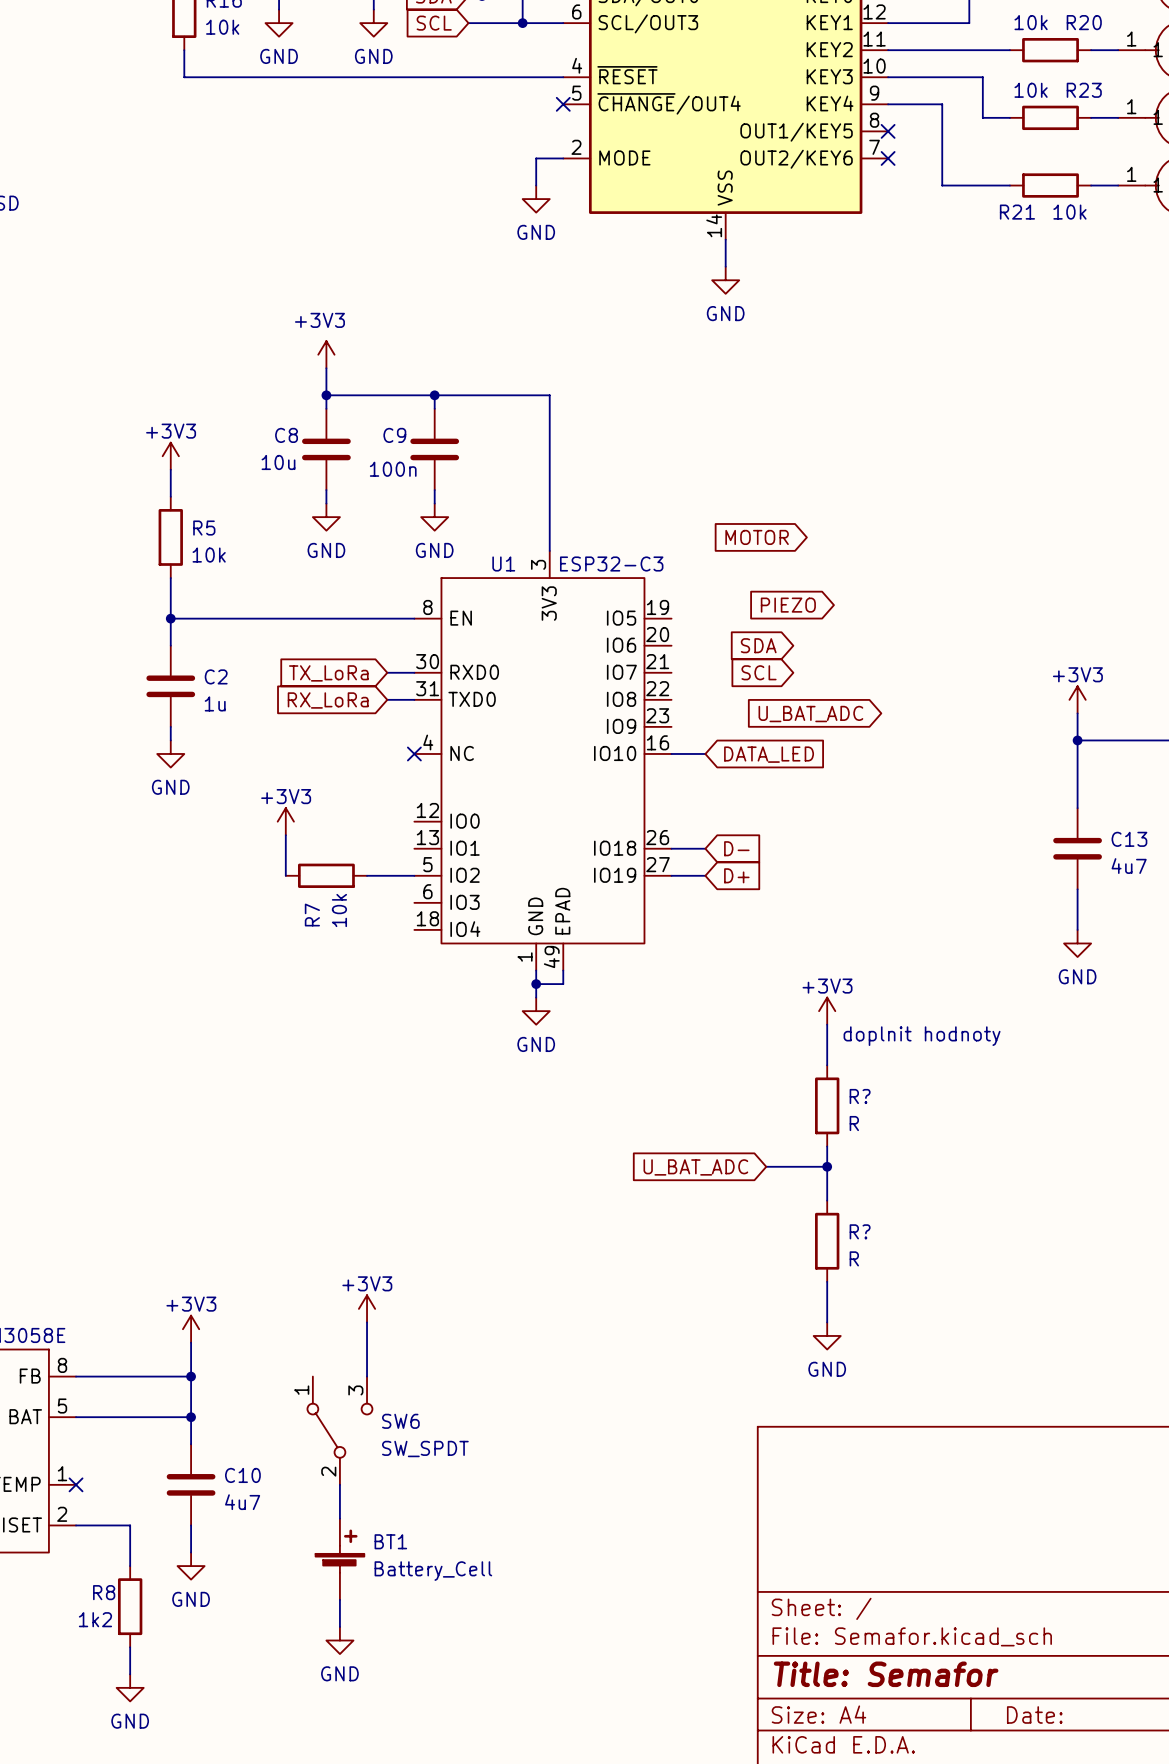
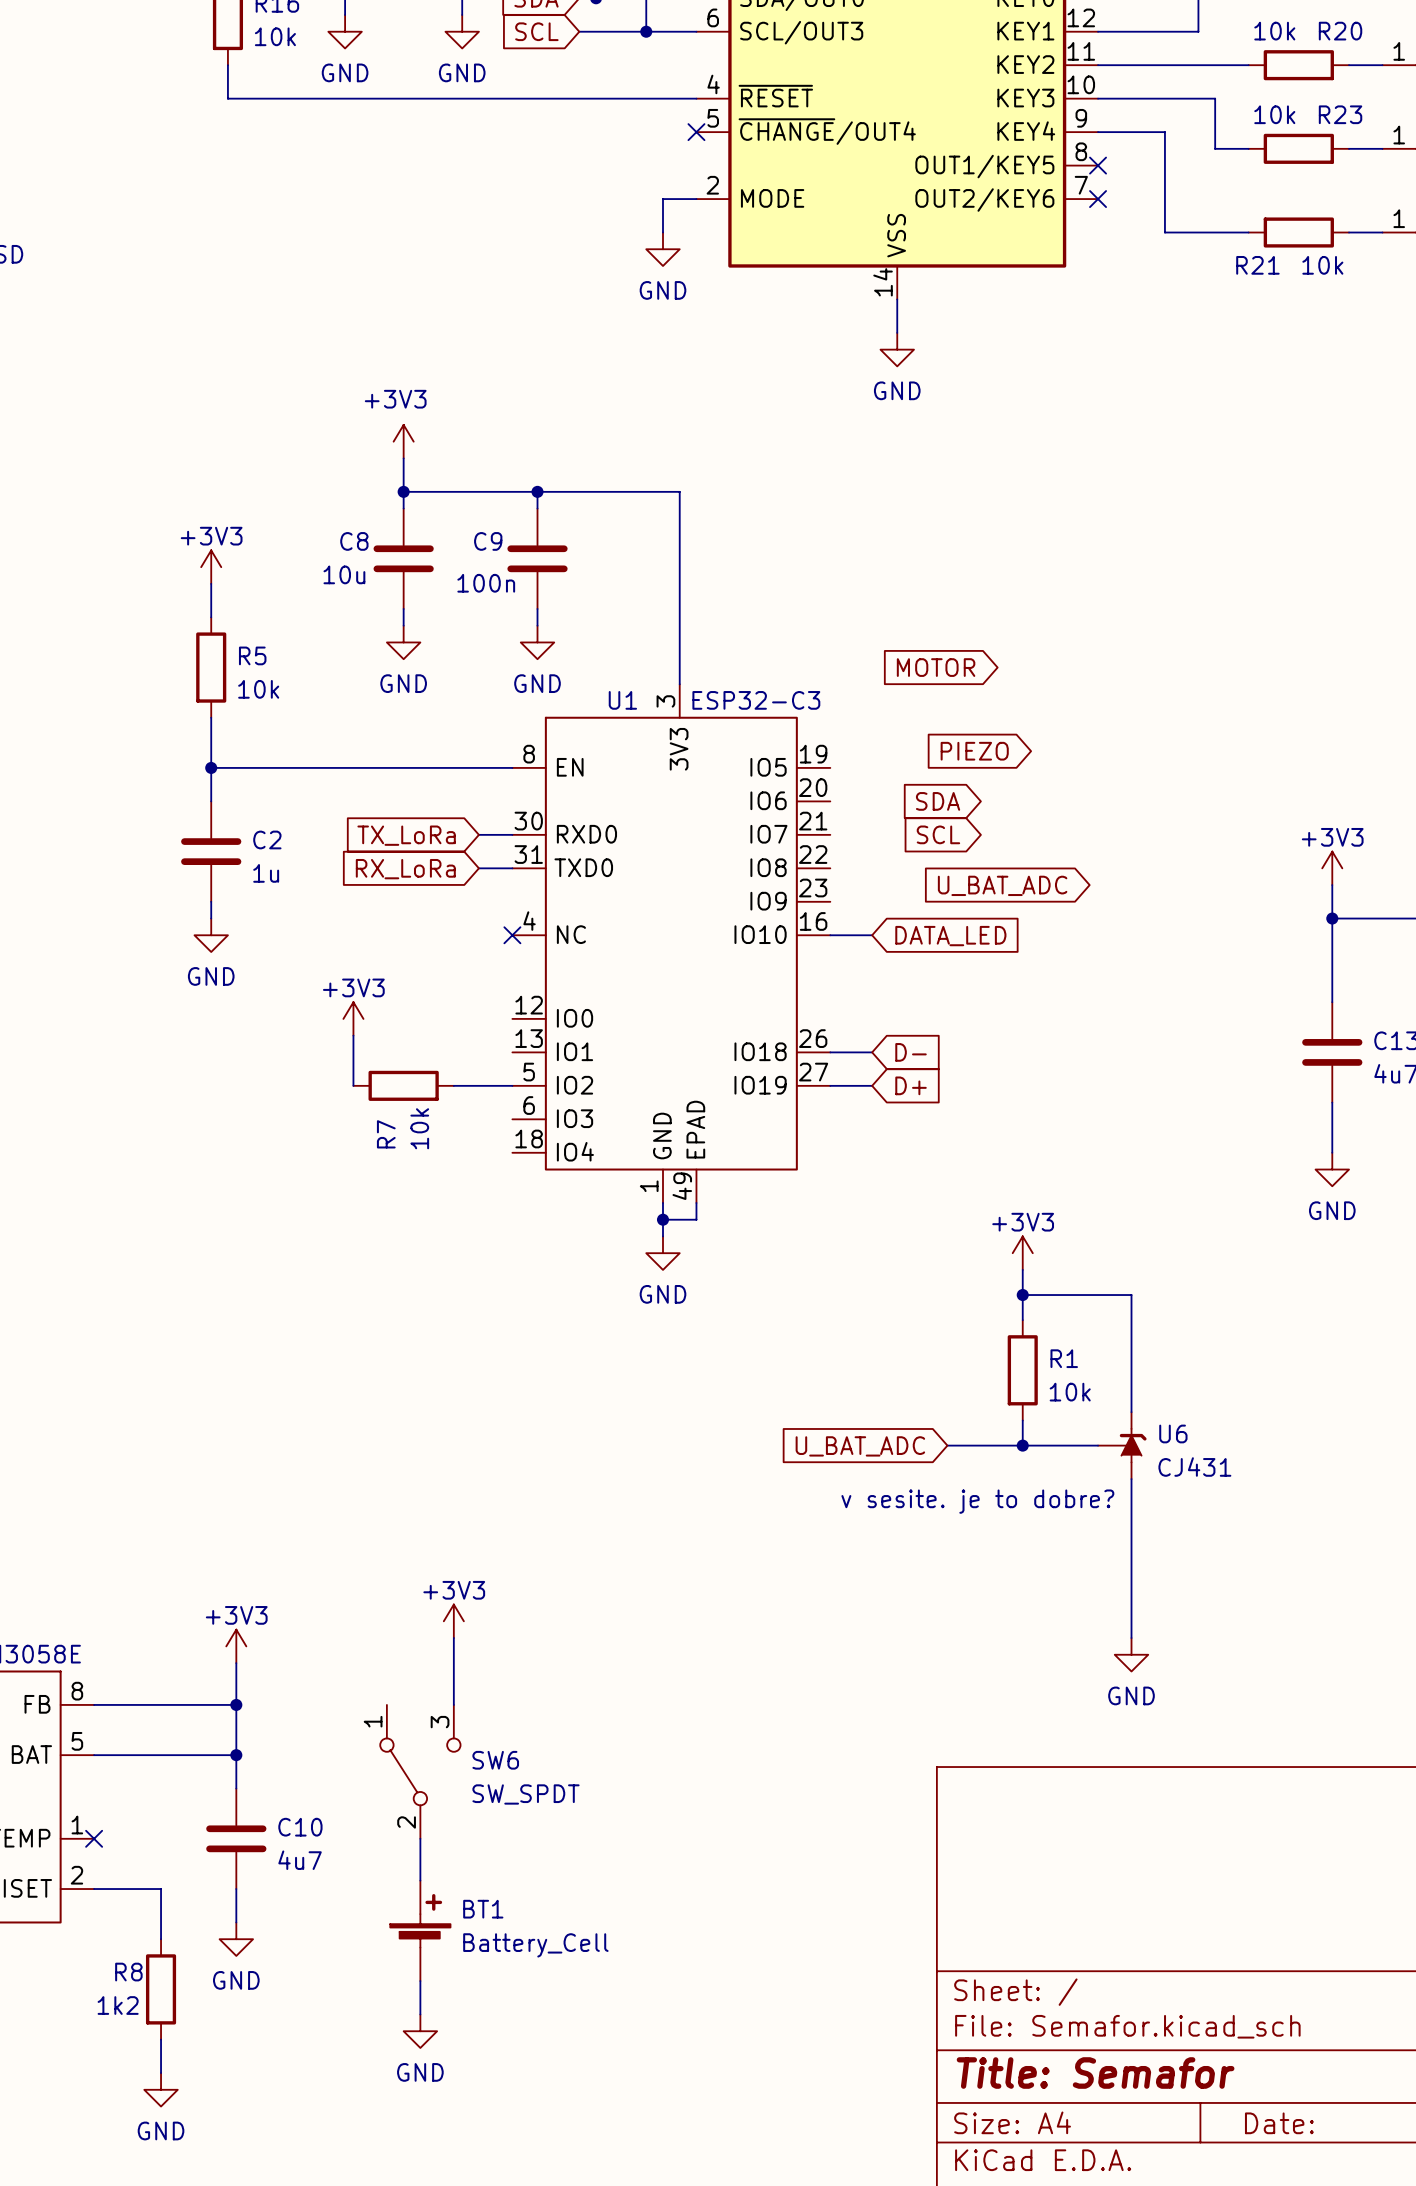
text: doplnit hodnoty (922, 1036) -> none
wire: none -> (1022, 1295) (1131, 1295) (1131, 1412)
junction: none -> (1022, 1295)
R? name: R? (860, 1096) -> R1 (1064, 1358)
R? value: R (854, 1123) -> 10k (1070, 1392)
wire: (827, 1166) (827, 1200) -> (1022, 1445) (1098, 1445)
U6: none -> CJ431 (1122, 1445)
wire: none -> (1131, 1479) (1131, 1638)
text: none -> v sesite. je to dobre? (977, 1501)
R?: R (827, 1241) -> none
wire: (827, 1281) (827, 1322) -> none
power symbol position: GND (827, 1335) -> GND (1131, 1654)

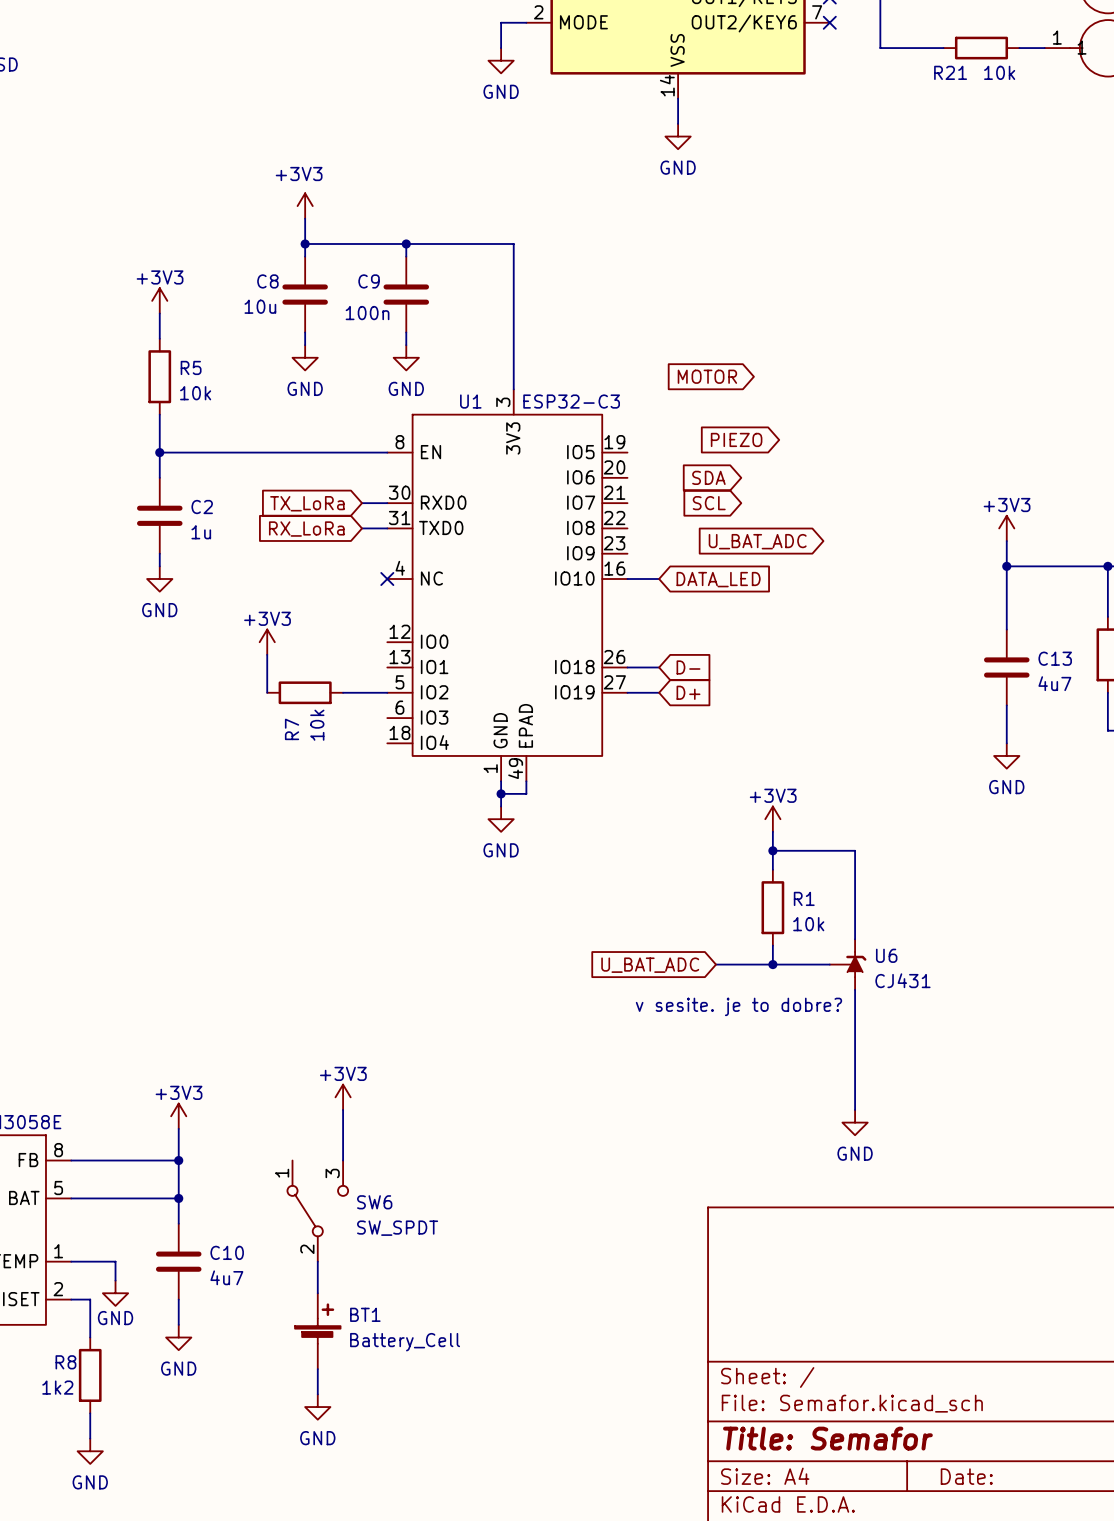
wire: none -> (71, 1261) (115, 1261) (115, 1280)
no-connect mark: (94, 1838) -> none
power symbol: none -> GND (115, 1293)
wire: (119, 1889) (161, 1889) (161, 1939) -> (90, 1299) (90, 1337)
R8 position: (161, 1989) -> (90, 1375)
wire: (161, 2039) (161, 2073) -> (90, 1413) (90, 1438)
power symbol position: GND (161, 2089) -> GND (90, 1451)

